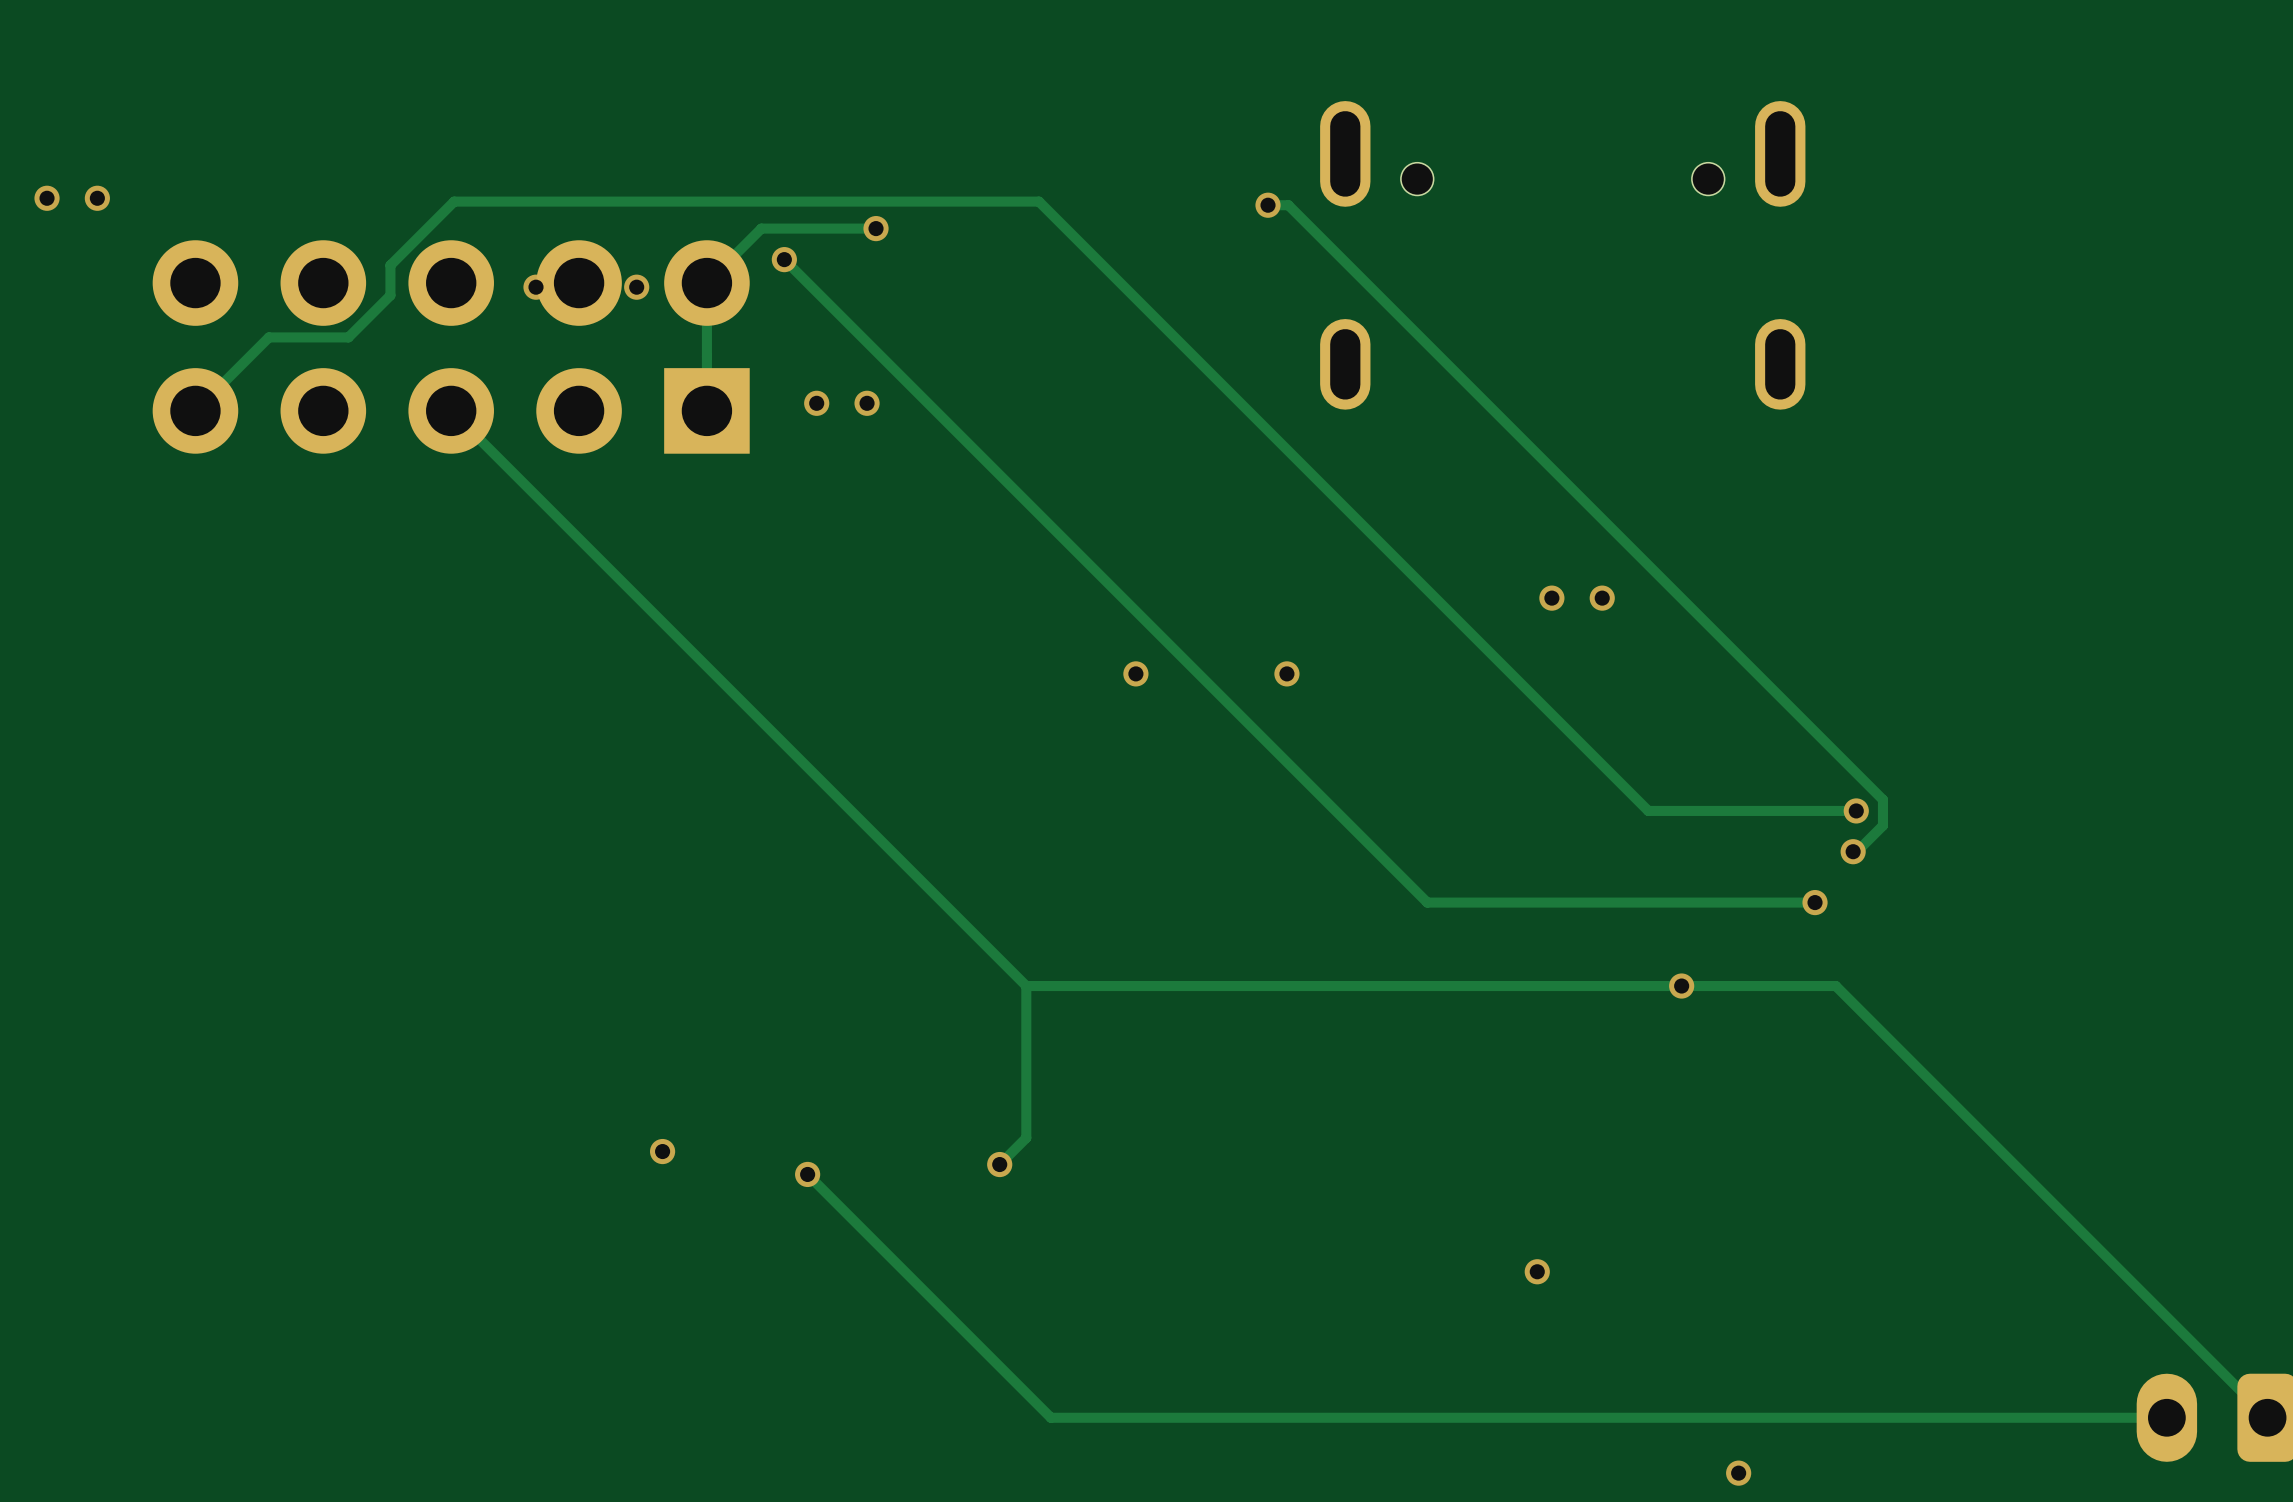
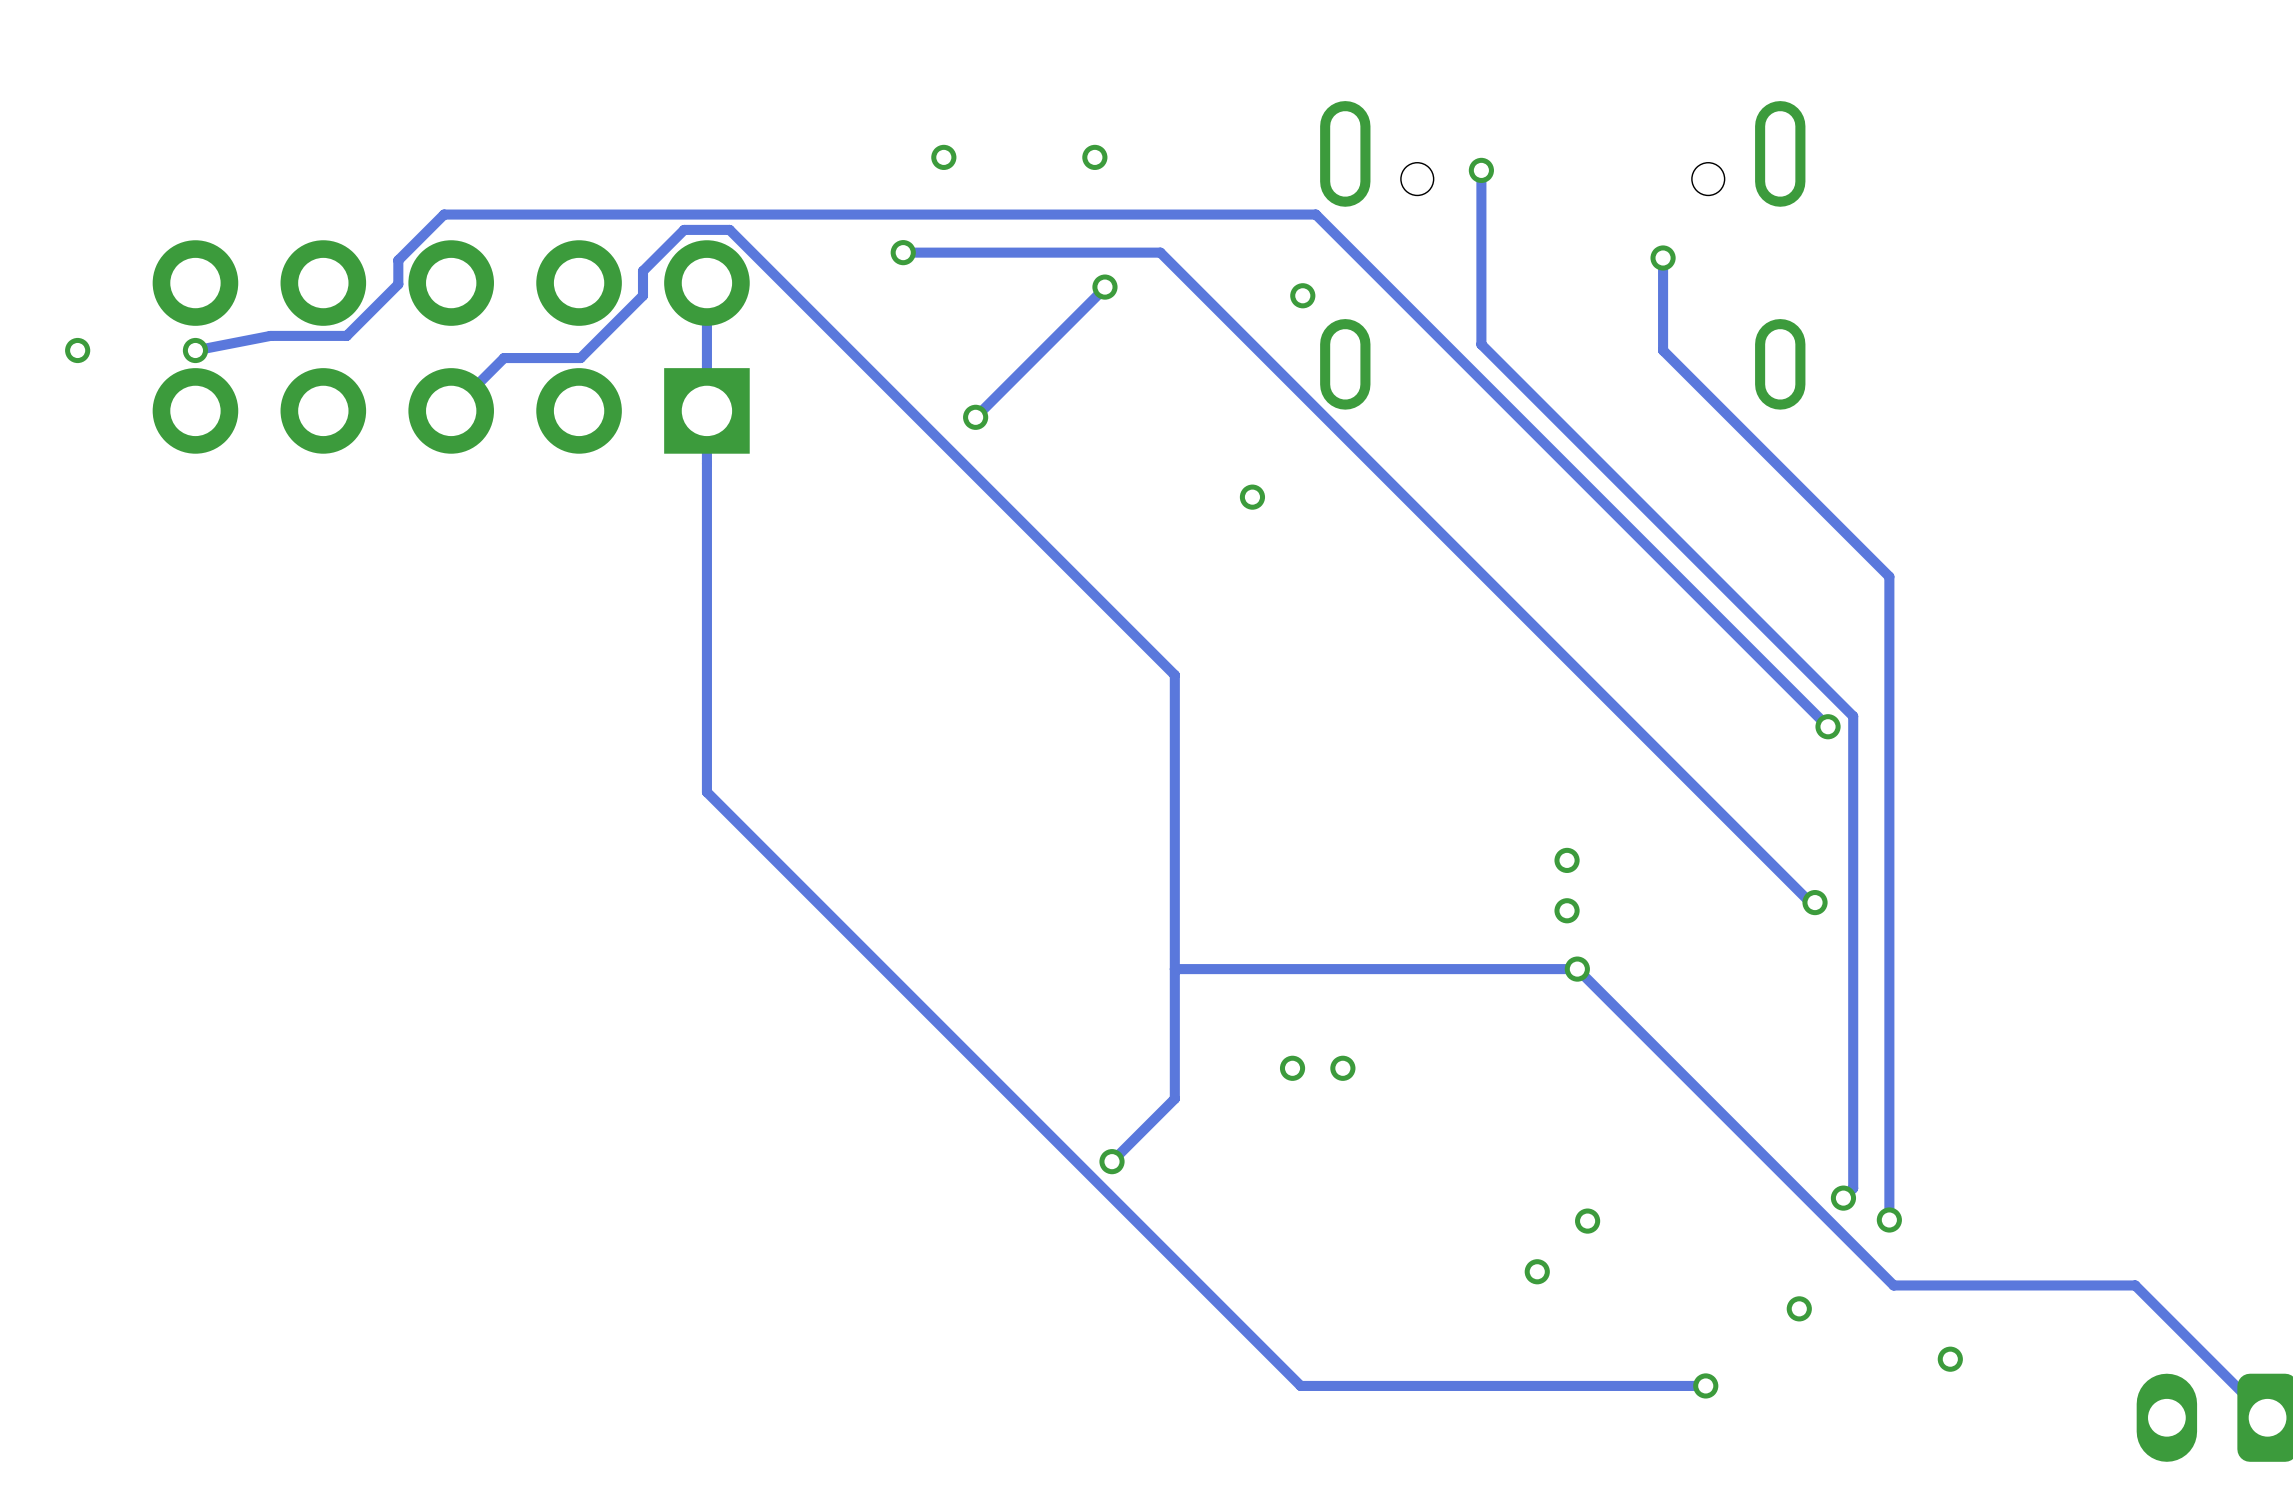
via: none -> (943, 157)
via: none -> (1094, 157)
track: none -> (1481, 170) (1481, 344) (1853, 716) (1853, 1188) (1843, 1198)
via: none -> (1481, 170)
via: (47, 198) -> none
via: (97, 198) -> none
track: (1268, 205) (1288, 205) (1882, 799) (1882, 825) (1856, 851) (1853, 851) -> none
via: (1268, 205) -> none
track: (876, 228) (761, 228) (706, 283) -> none
via position: (876, 228) -> (903, 252)
track: none -> (903, 252) (1160, 252) (1810, 902)
track: none -> (1663, 258) (1663, 350) (1889, 576) (1889, 1220)
via: none -> (1663, 258)
track: (784, 259) (1427, 902) (1815, 902) -> none
via: (784, 259) -> none
via: (536, 287) -> none
via: (636, 287) -> none
track: none -> (1104, 287) (975, 417)
via: none -> (1104, 287)
via: none -> (1302, 295)
via: none -> (77, 350)
track: none -> (195, 350) (270, 335) (346, 335) (398, 284) (398, 260) (444, 214) (1315, 214) (1828, 726)
via: none -> (195, 350)
via: (816, 403) -> none
via: (867, 403) -> none
track: (195, 410) (268, 337) (348, 337) (390, 295) (390, 265) (454, 201) (1038, 201) (1648, 810) (1856, 810) -> none
track: (451, 410) (1026, 986) -> (451, 410) (504, 358) (580, 358) (643, 295) (643, 271) (684, 229) (729, 229) (1174, 675) (1174, 1098) (1112, 1161)
track: none -> (706, 410) (706, 792) (1300, 1385) (1705, 1385)
via: none -> (975, 417)
via: none -> (1252, 497)
via: (1551, 598) -> none
via: (1602, 598) -> none
via: (1135, 673) -> none
via: (1286, 673) -> none
via: none -> (1828, 726)
via: (1856, 810) -> none
via: (1853, 851) -> none
via: none -> (1567, 860)
via: none -> (1567, 910)
via: none -> (1577, 969)
track: (1026, 986) (1835, 986) (2135, 1285) -> (1174, 969) (1577, 969) (1893, 1285) (2135, 1285)
track: (1026, 986) (1026, 1137) (999, 1164) -> none
via: (1681, 986) -> none
via: none -> (1292, 1068)
via: none -> (1342, 1068)
via: (662, 1151) -> none
via position: (999, 1164) -> (1112, 1161)
track: (807, 1174) (1050, 1417) (2166, 1417) -> none
via: (807, 1174) -> none
via: none -> (1843, 1198)
via: none -> (1889, 1220)
via: none -> (1587, 1221)
via: none -> (1799, 1308)
via: none -> (1950, 1359)
via: none -> (1705, 1385)
via: (1738, 1473) -> none

